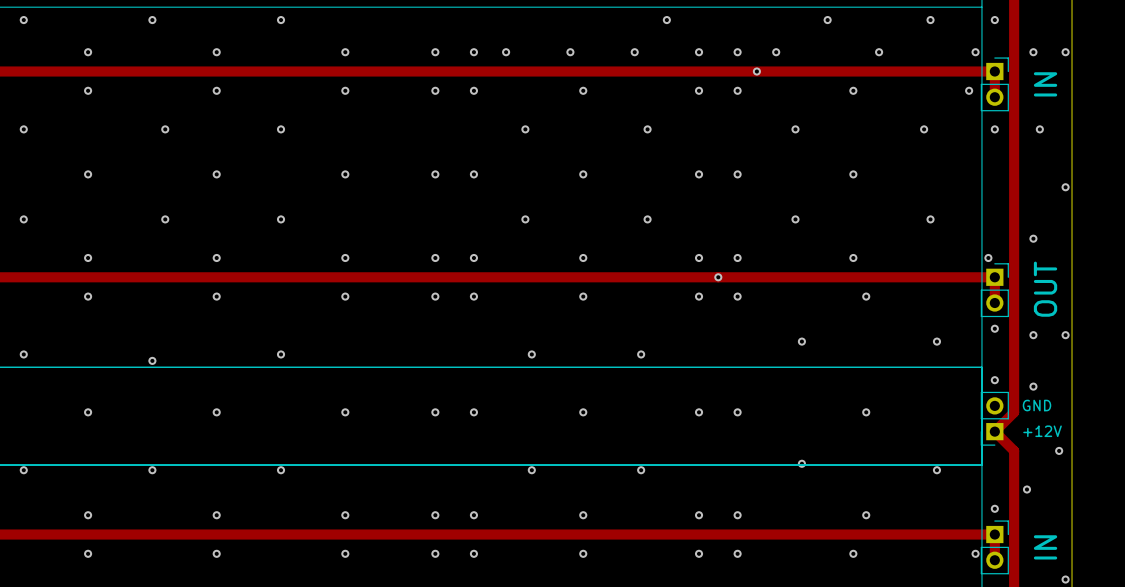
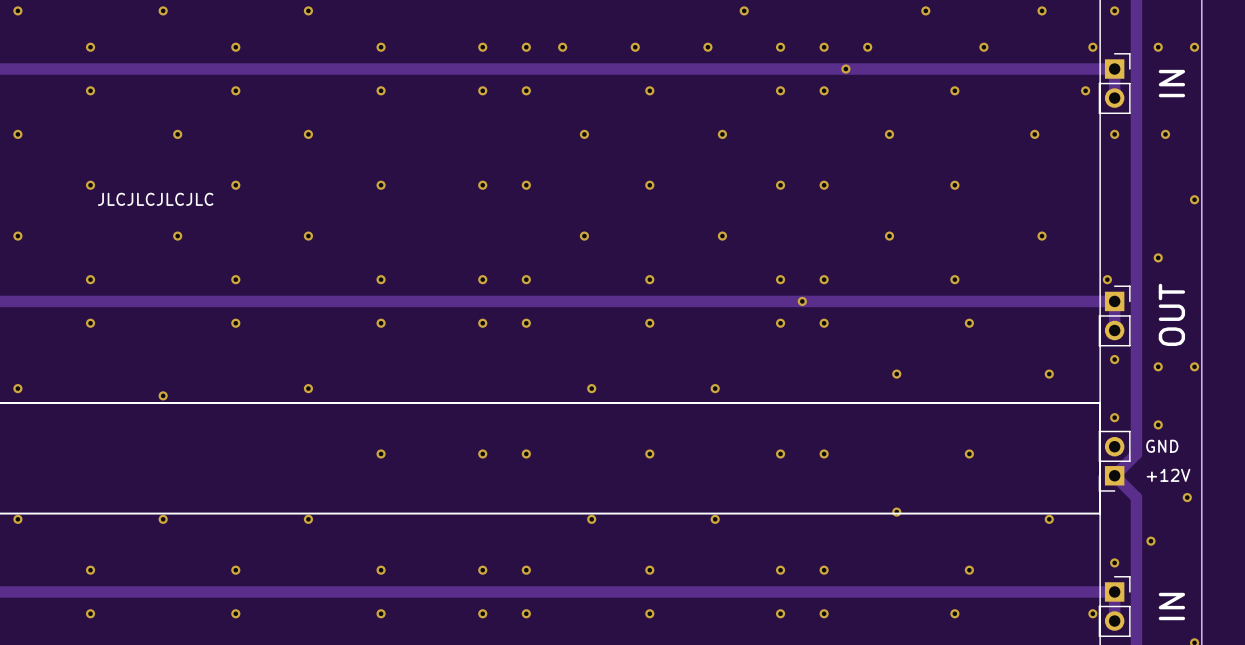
text: none -> JLCJLCJLCJLC (155, 199)
via: (88, 412) -> none
via: (216, 412) -> none

